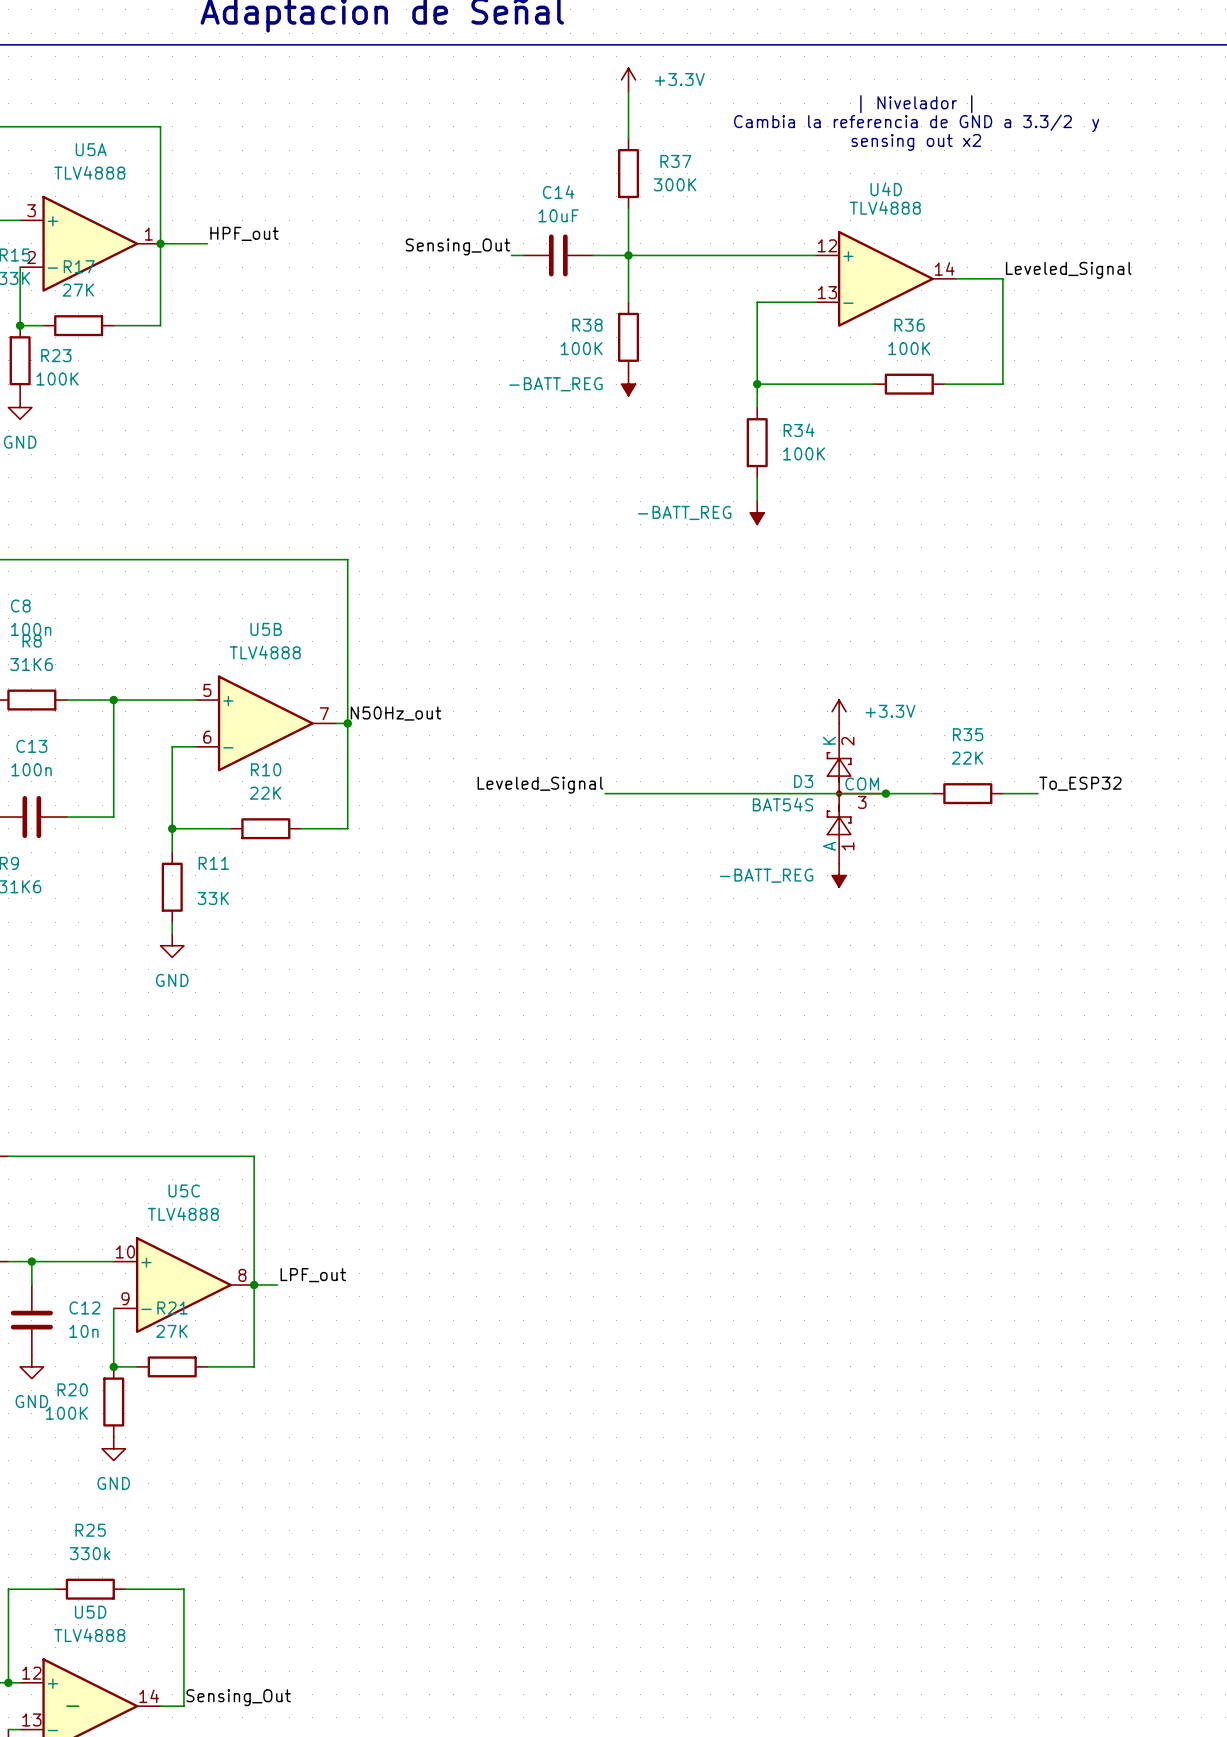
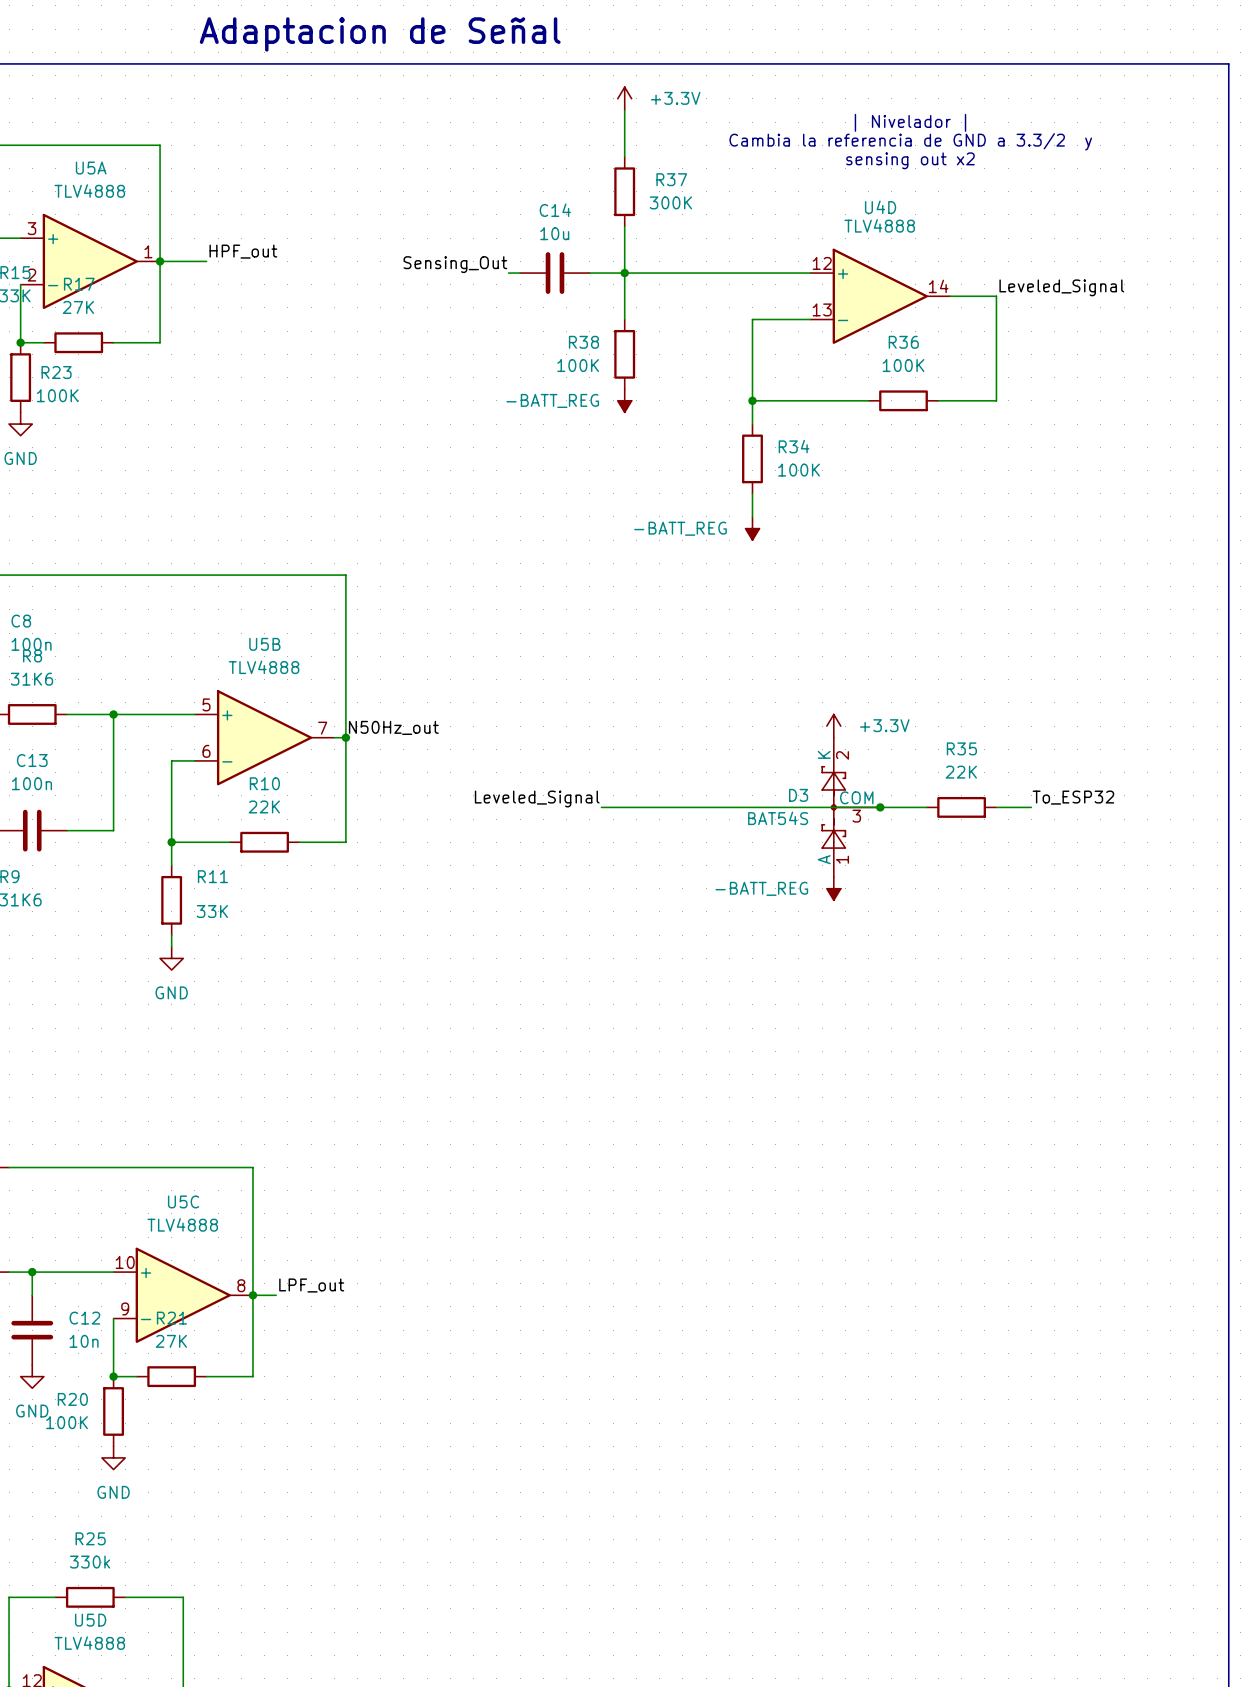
C14 value: 10uF (558, 215) -> 10u (554, 233)

